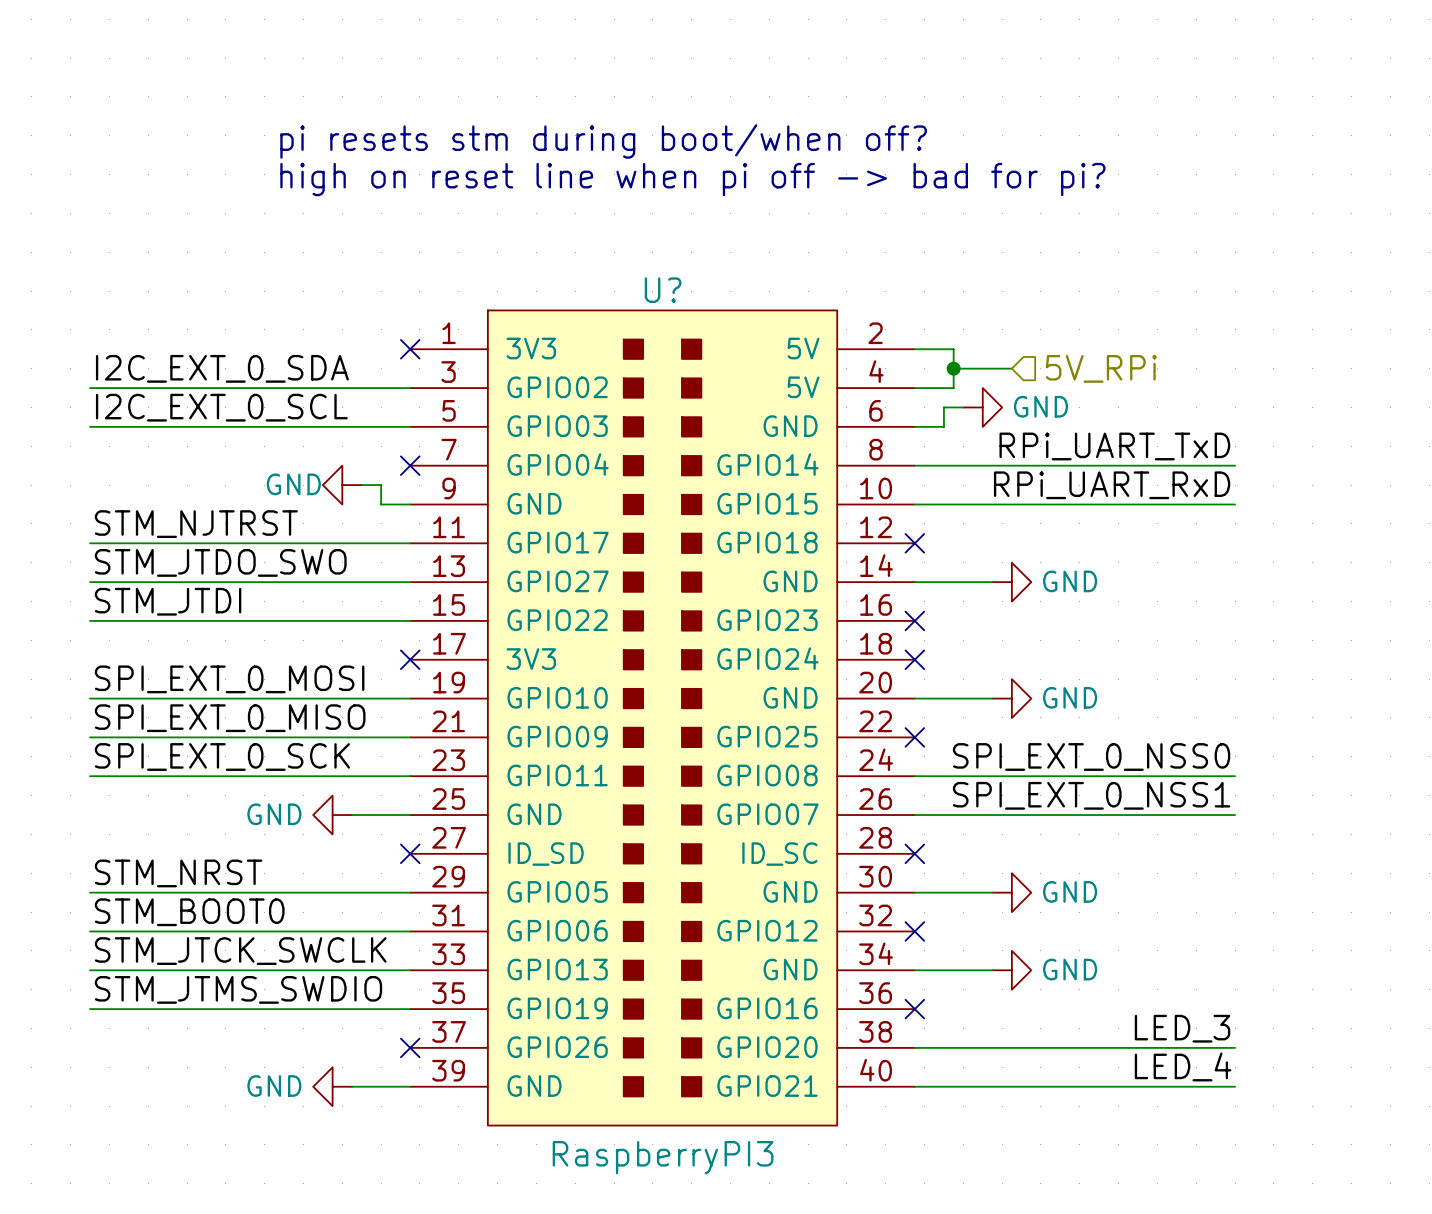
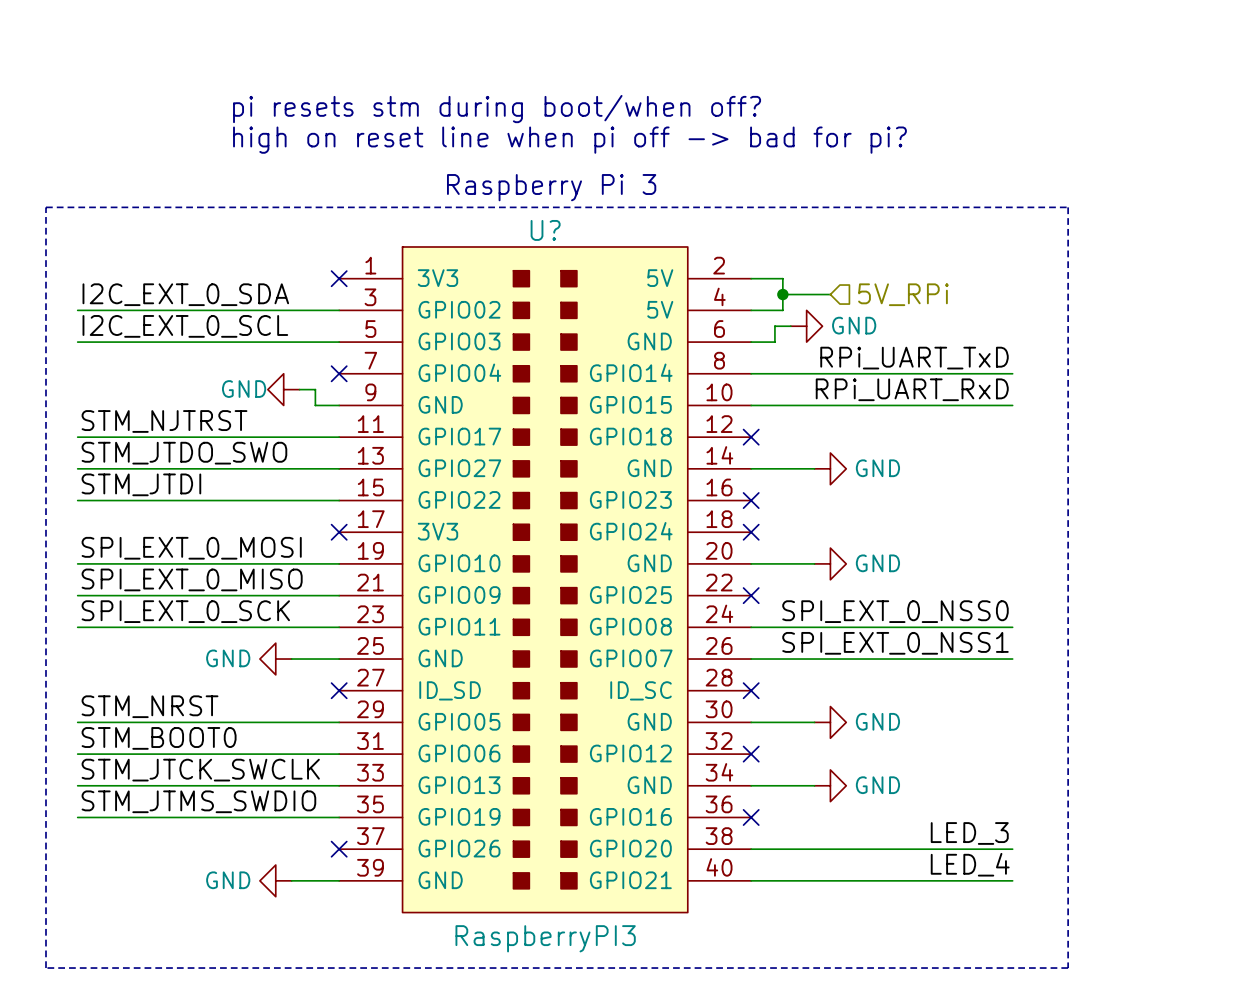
text: none -> Raspberry Pi 3 (551, 187)
line: none -> (45, 207) (45, 968) (1068, 968) (1068, 207) (45, 207)

